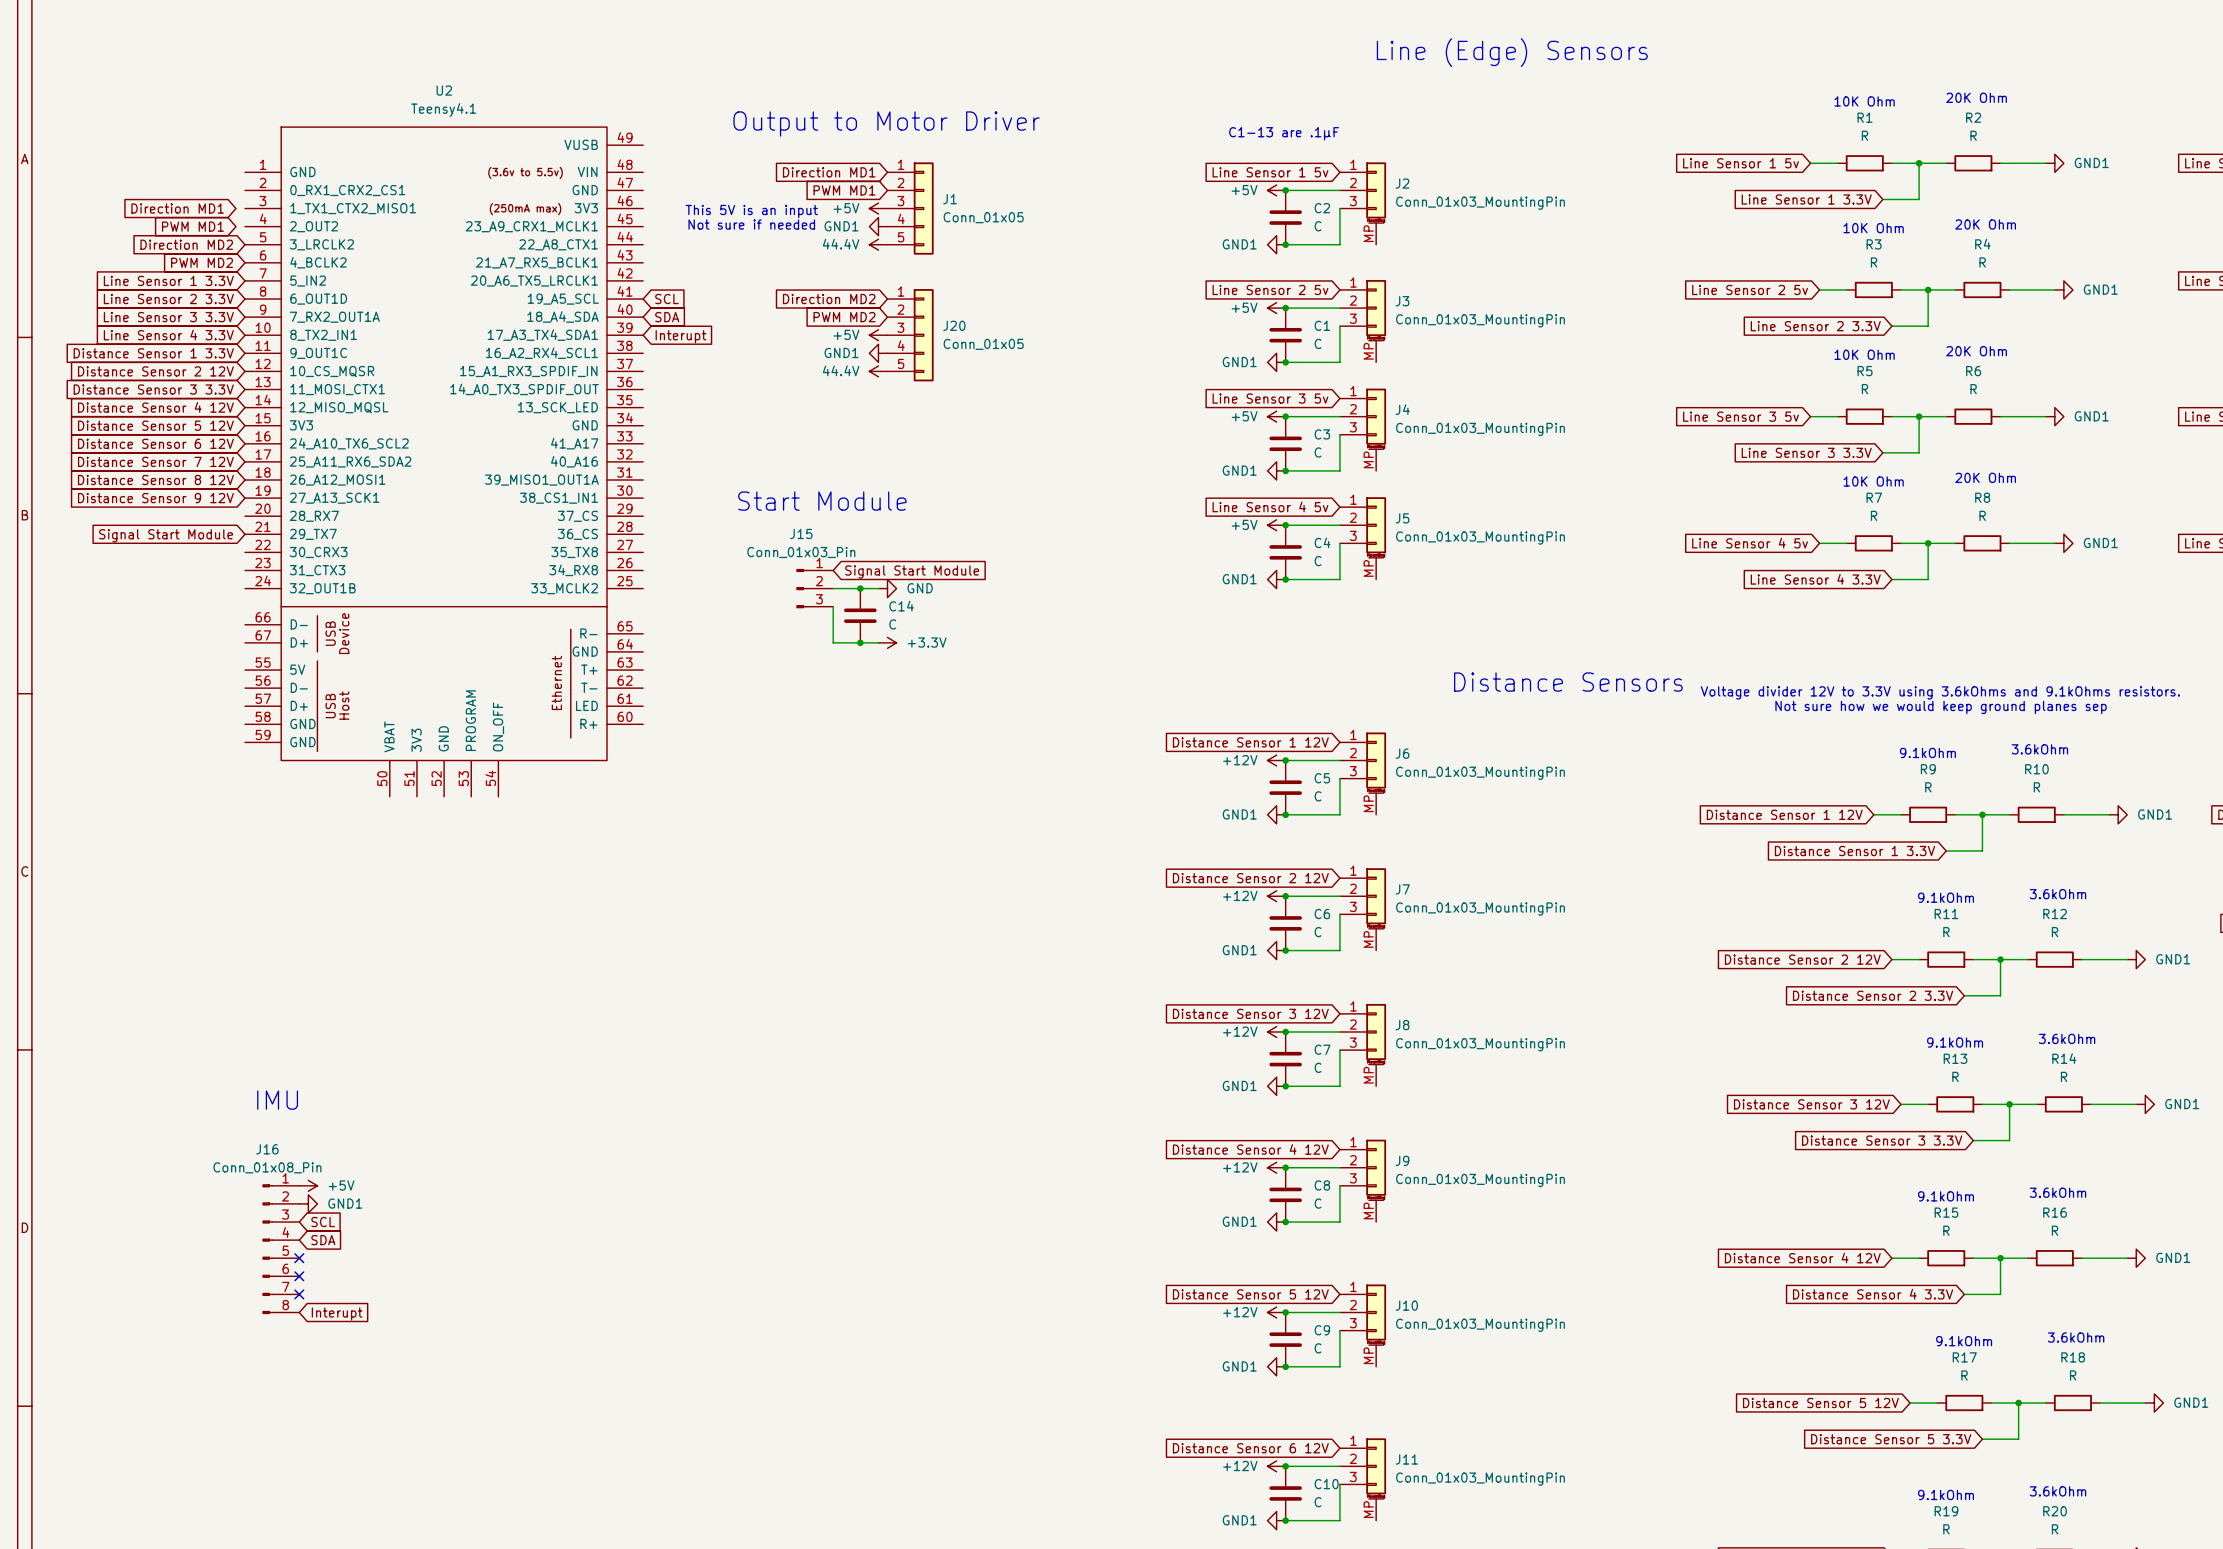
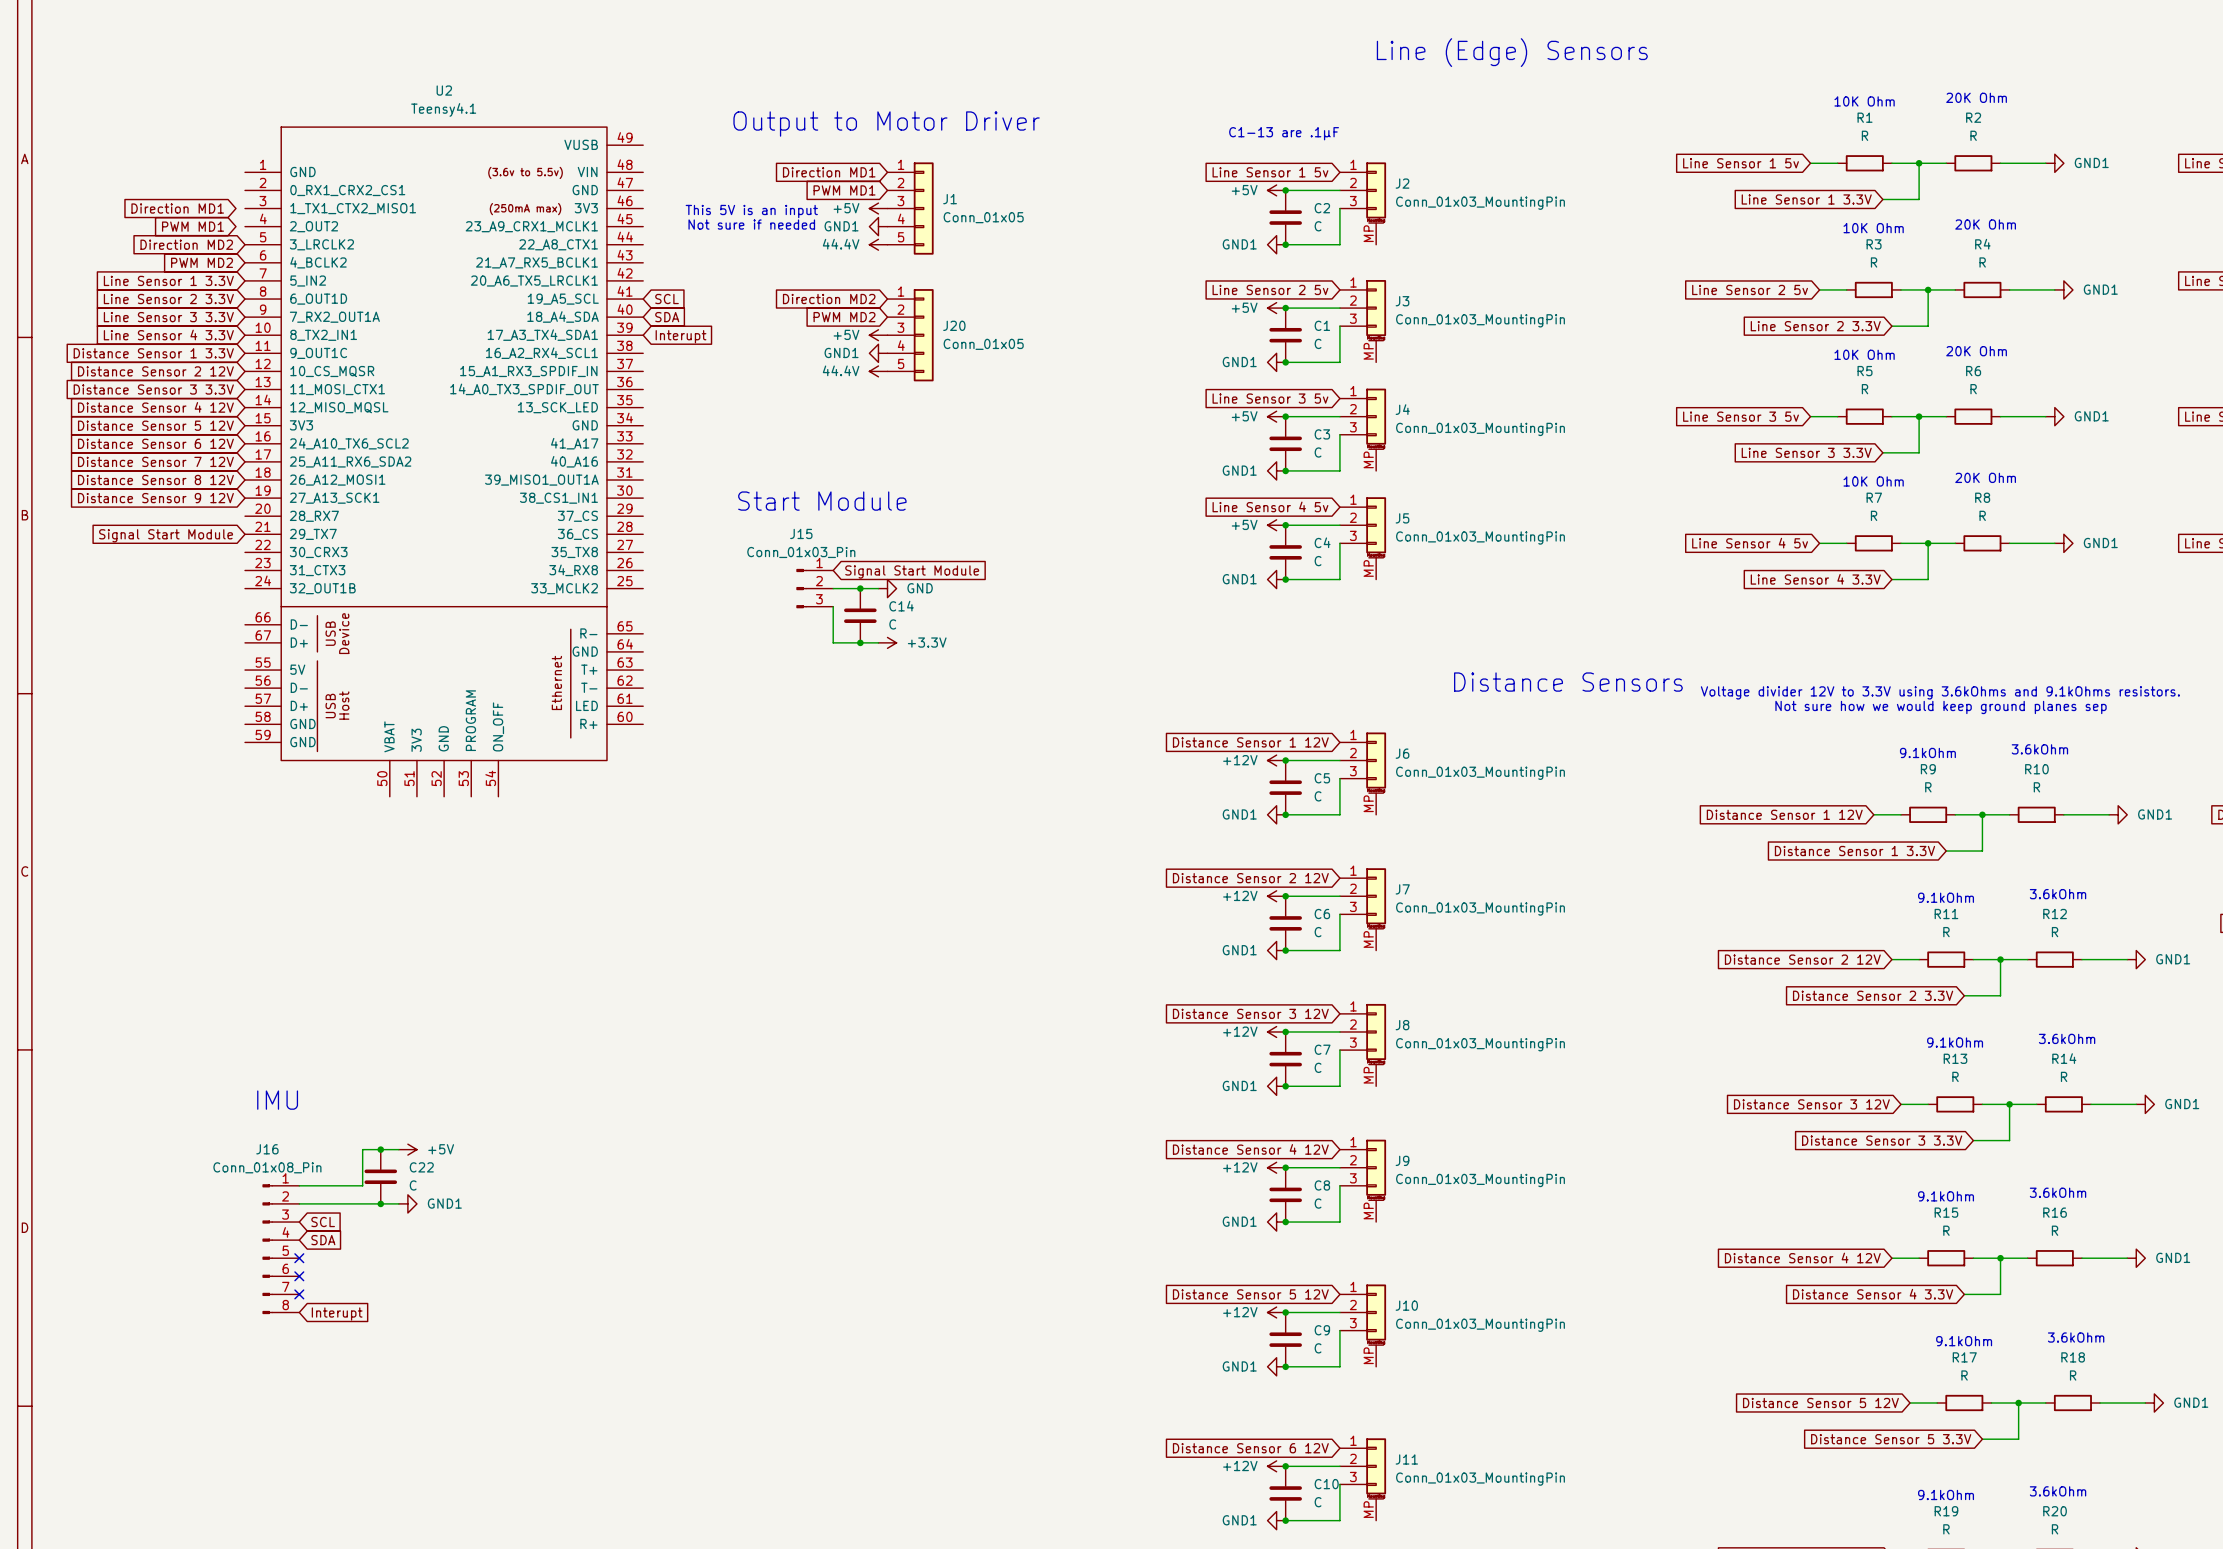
junction: none -> (380, 1149)
wire: none -> (398, 1149) (362, 1149) (362, 1185) (299, 1185)
C22: none -> C (380, 1176)
power symbol position: +5V (308, 1185) -> +5V (407, 1149)
wire: none -> (299, 1203) (398, 1203)
power symbol position: GND1 (308, 1203) -> GND1 (407, 1203)
junction: none -> (380, 1203)

